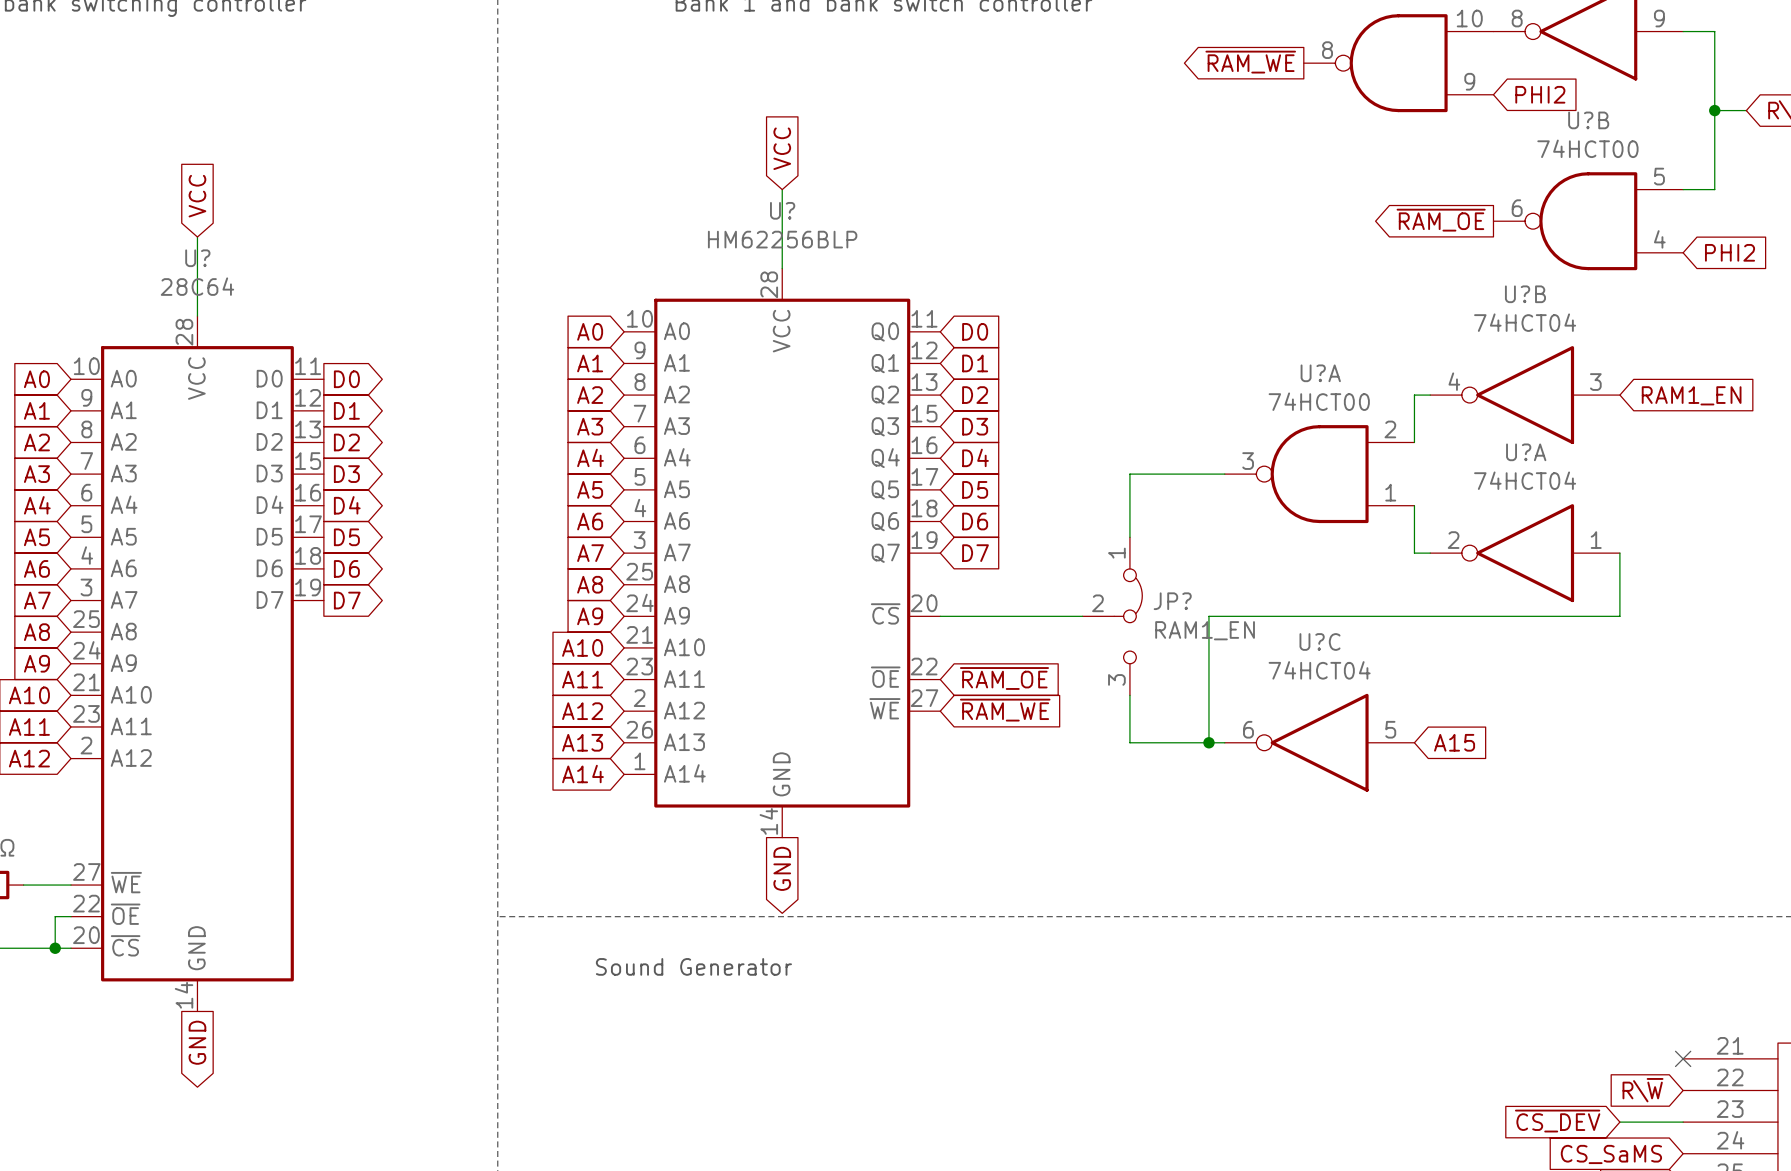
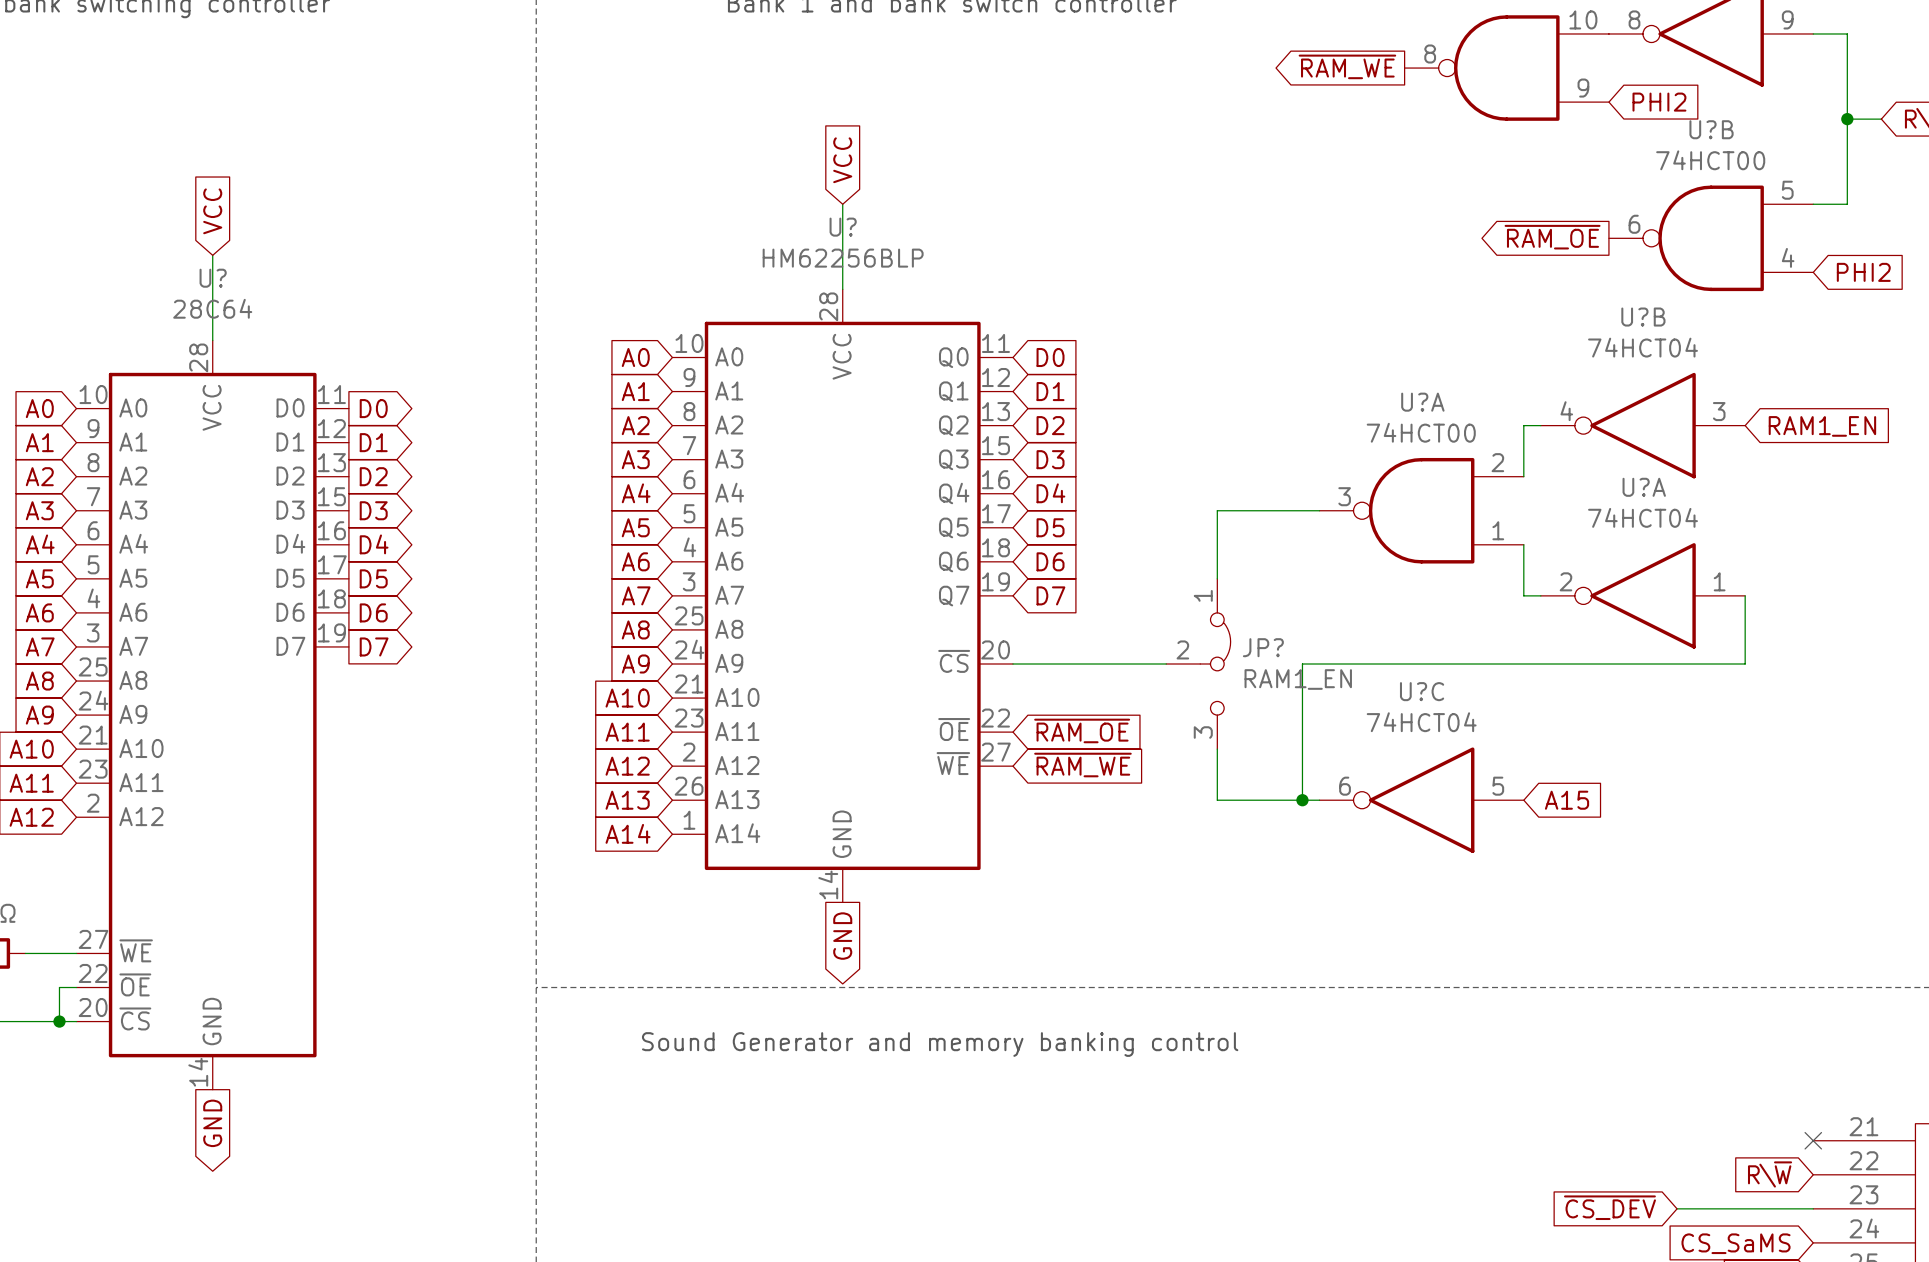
text: Sound Generator (693, 966) -> Sound Generator and memory banking control (940, 1044)
global label position: ~{CS_DEV} (1557, 1121) -> ~{CS_DEV} (1609, 1207)
wire: none -> (1677, 1208) (1745, 1208)

